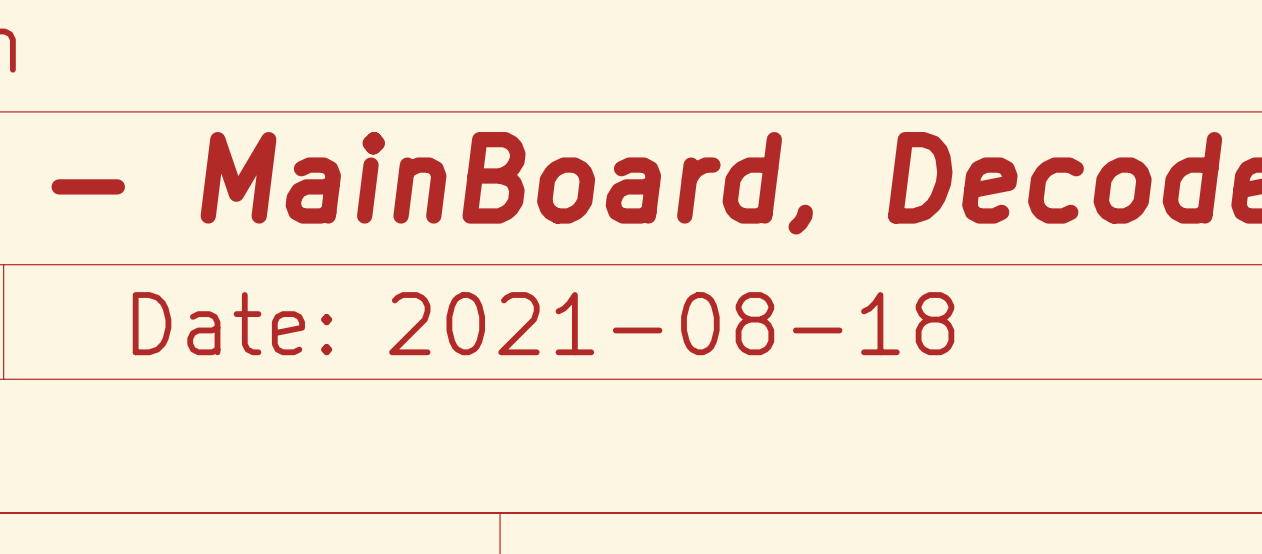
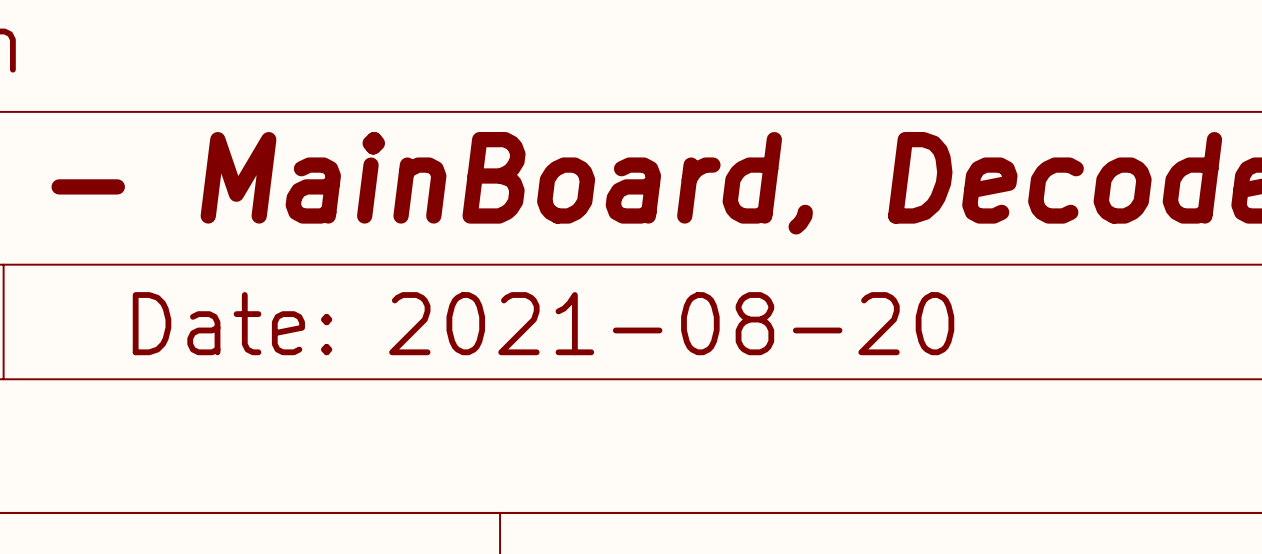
title block: Date: 2021-08-18 (543, 323) -> Date: 2021-08-20 (543, 323)

